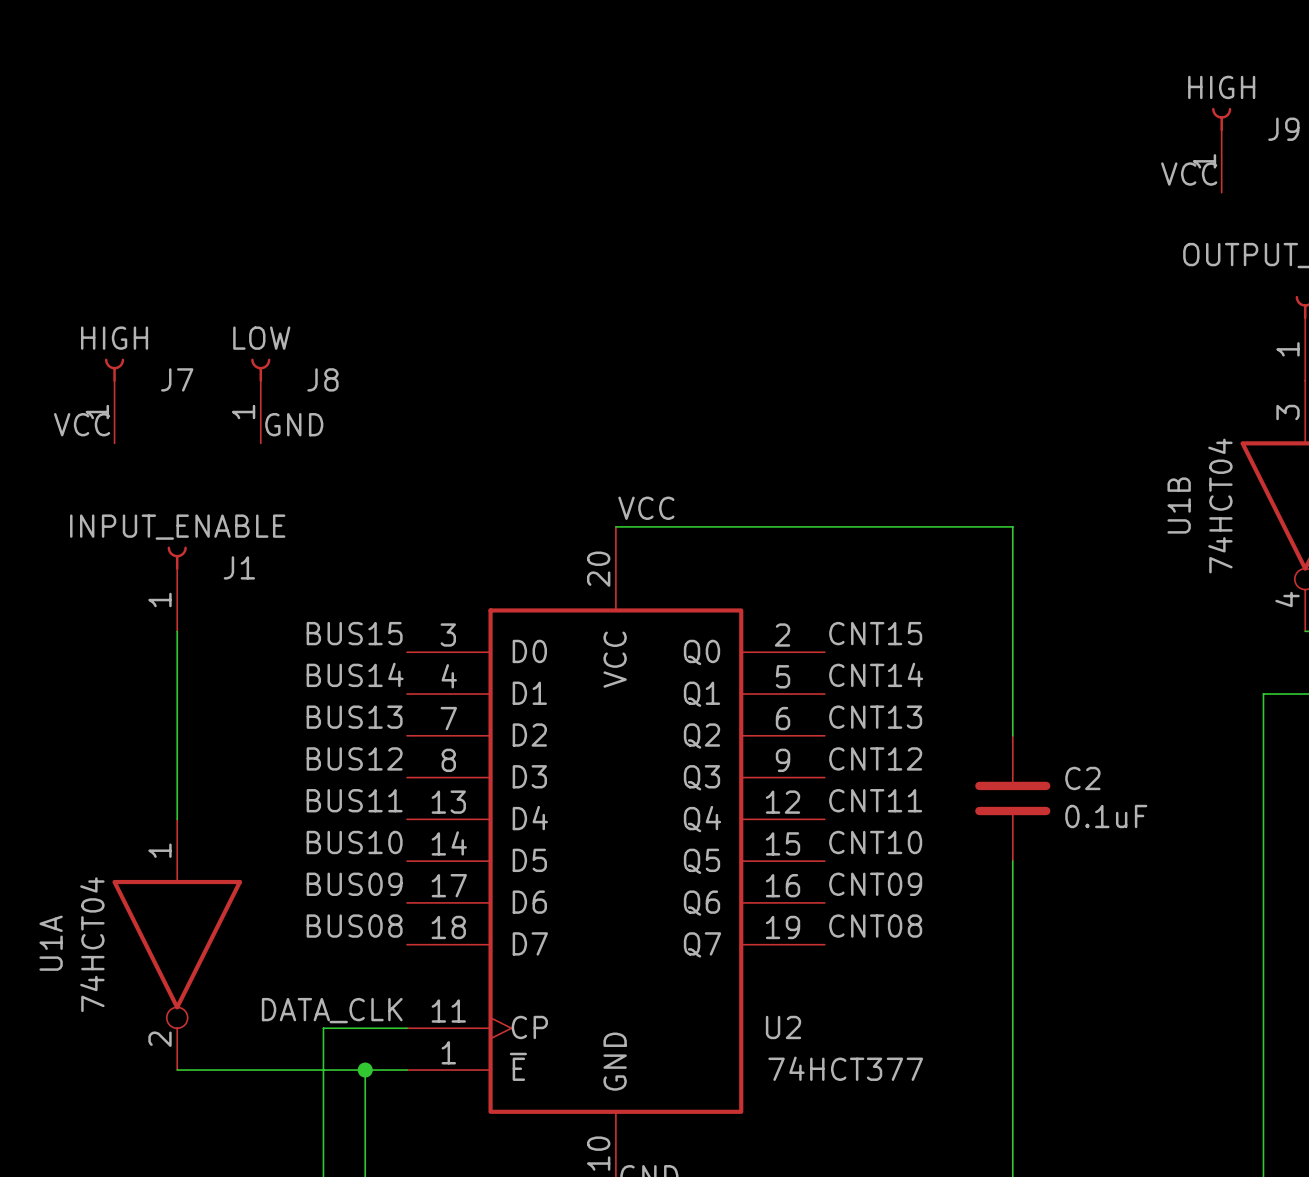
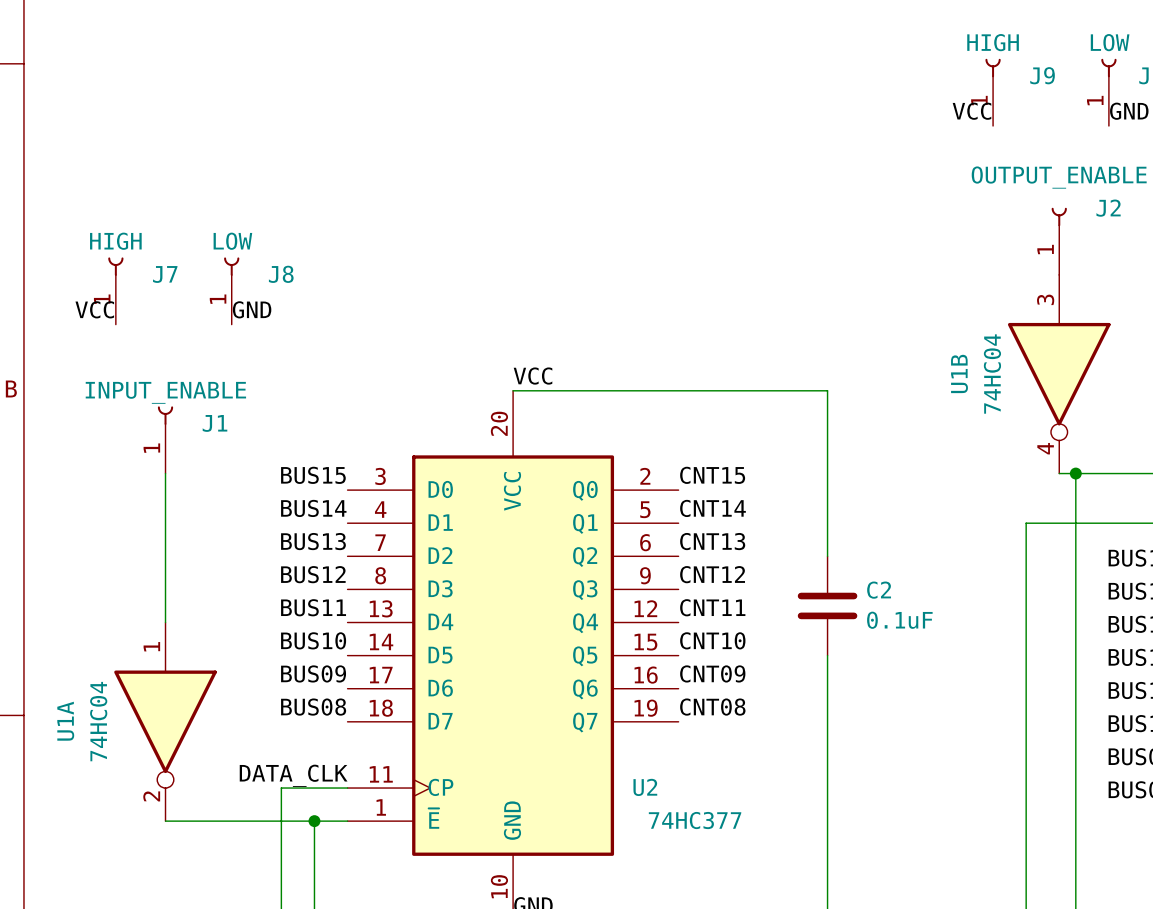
U1B value: 74HCT04 (1220, 506) -> 74HC04 (992, 374)
U1A value: 74HCT04 (92, 944) -> 74HC04 (98, 721)
U2 value: 74HCT377 (845, 1068) -> 74HC377 (695, 820)

